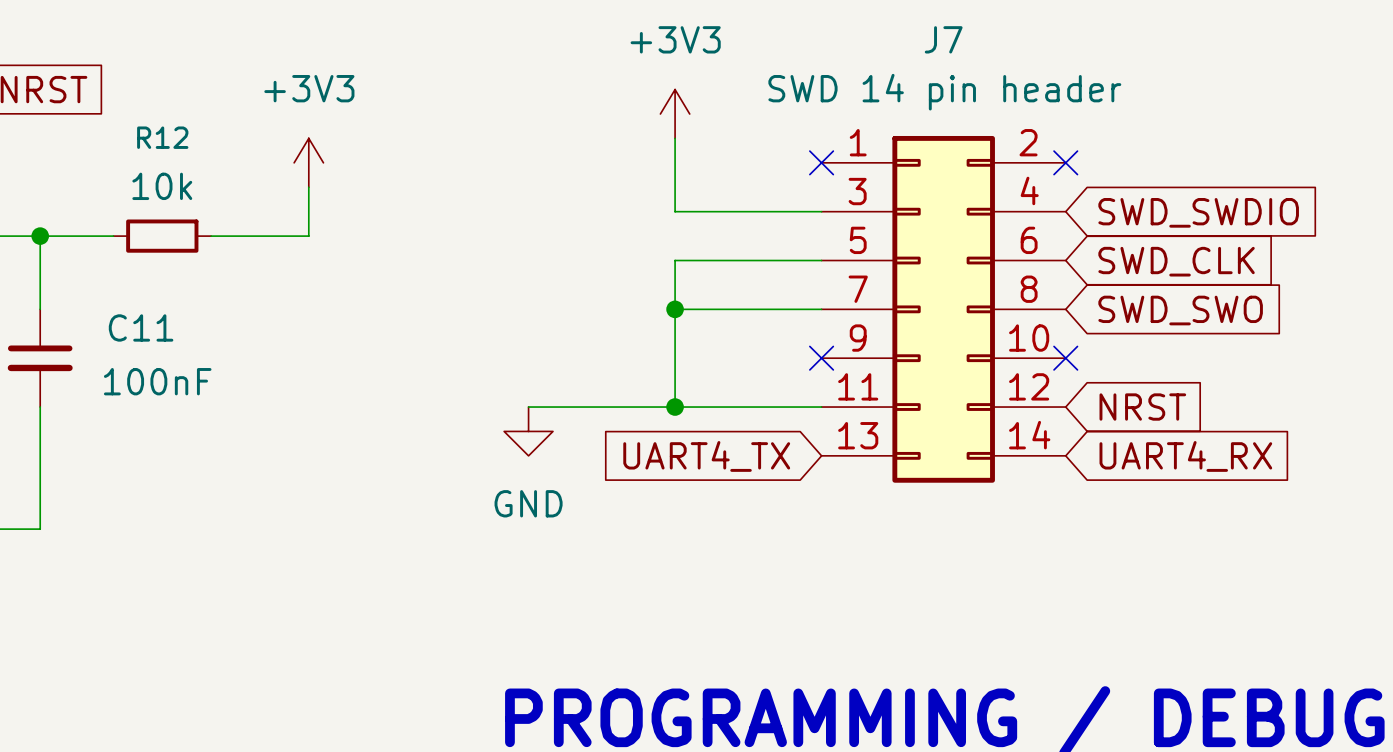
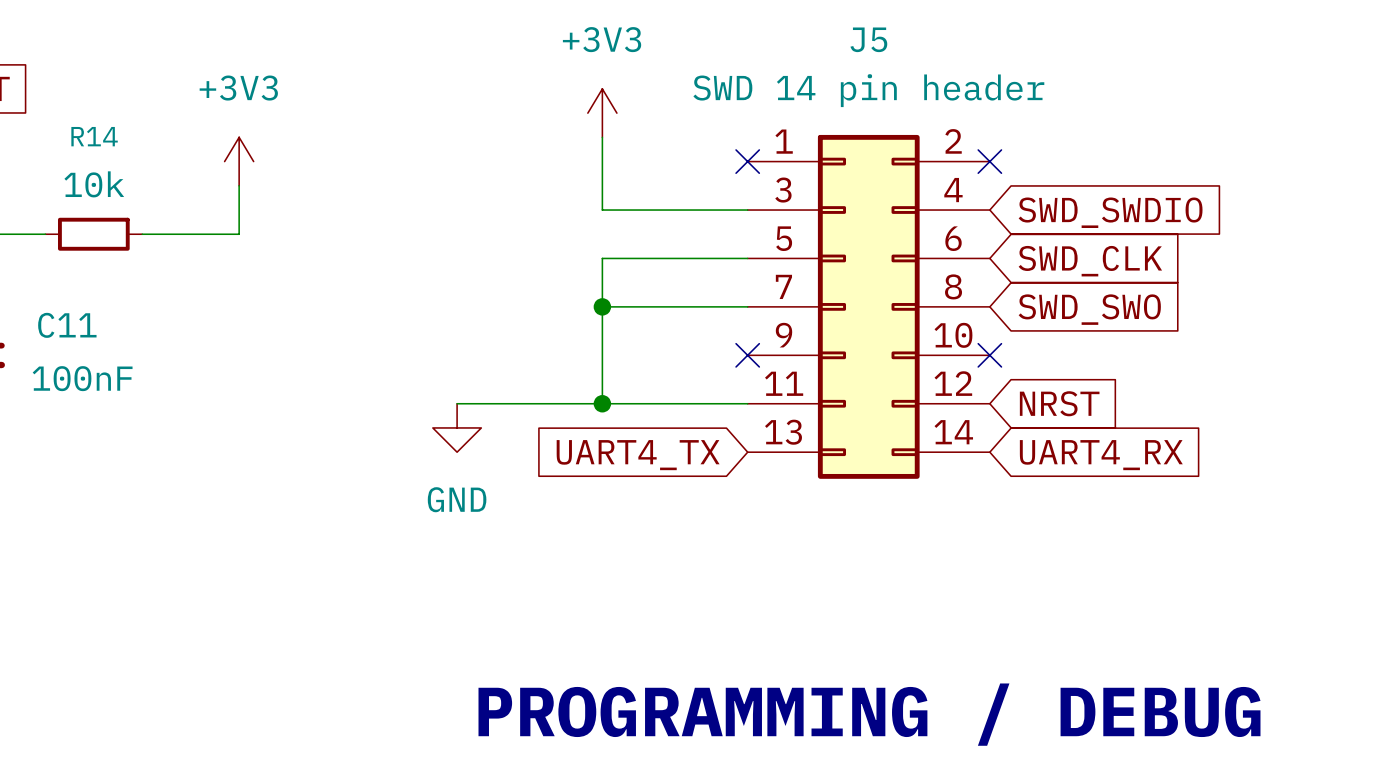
J7 name: J7 (943, 39) -> J5 (868, 39)
R12 name: R12 (162, 137) -> R14 (94, 136)

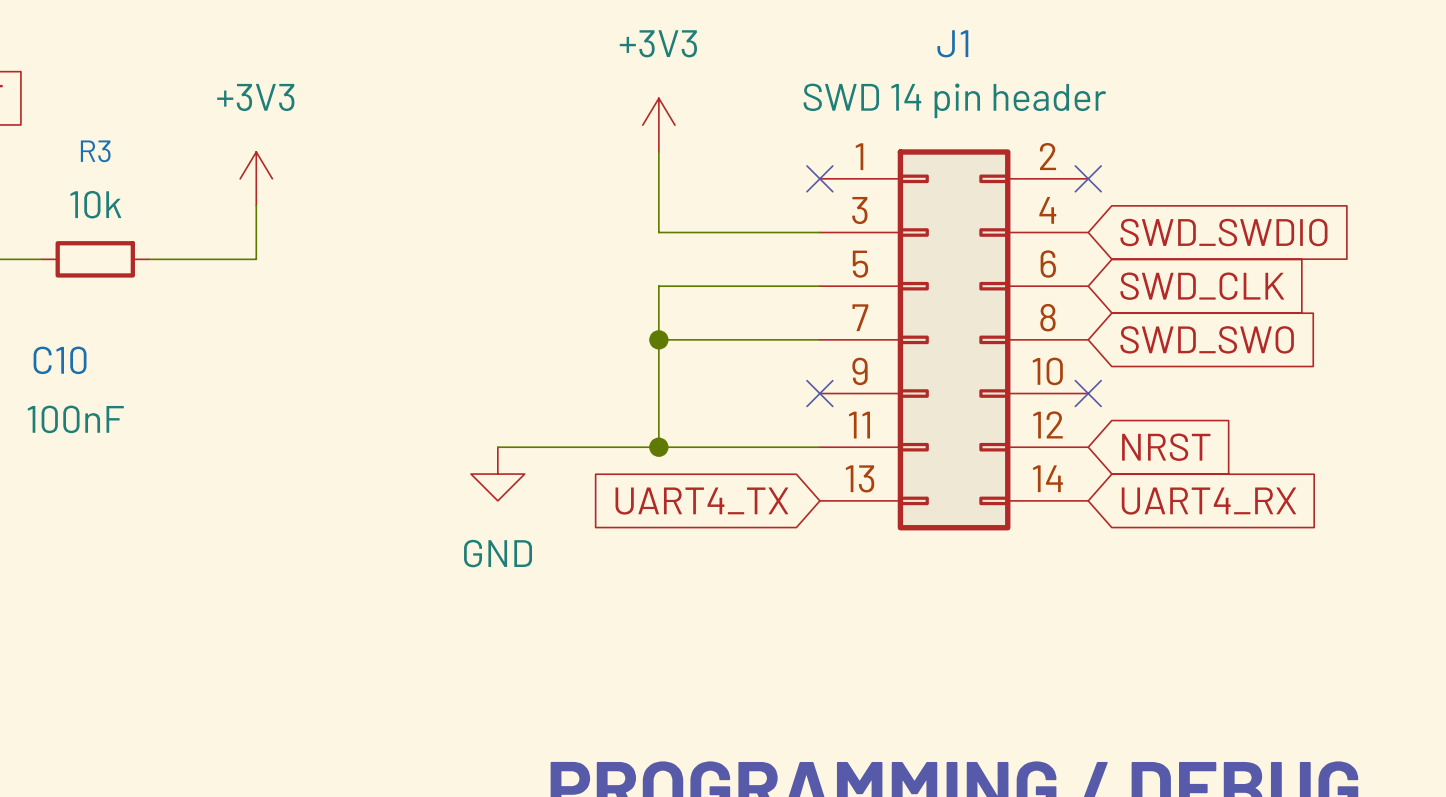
J5 name: J5 (868, 39) -> J1 (952, 43)
R14 name: R14 (94, 136) -> R3 (95, 151)
C11 name: C11 (67, 325) -> C10 (60, 360)

